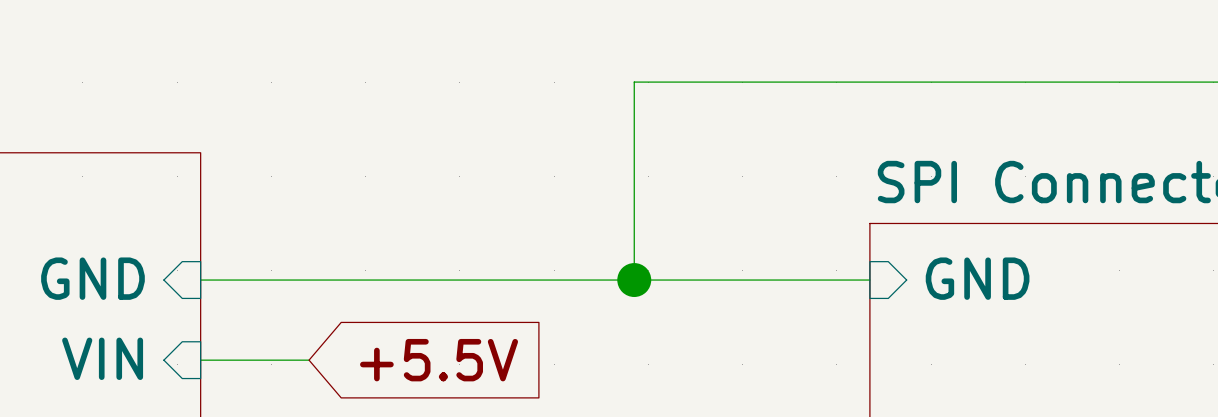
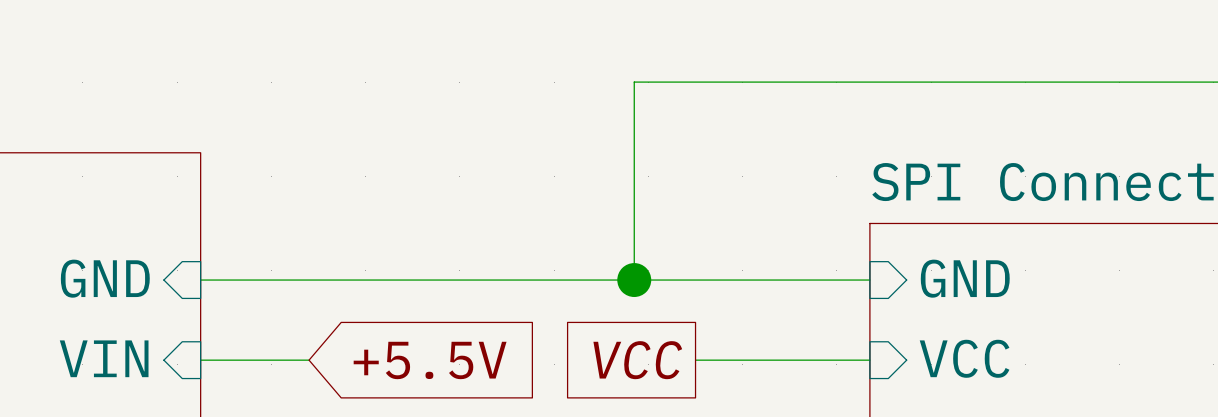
sheet pin: none -> VCC (964, 358)
global label: none -> VCC (637, 360)
wire: none -> (695, 360) (869, 360)

